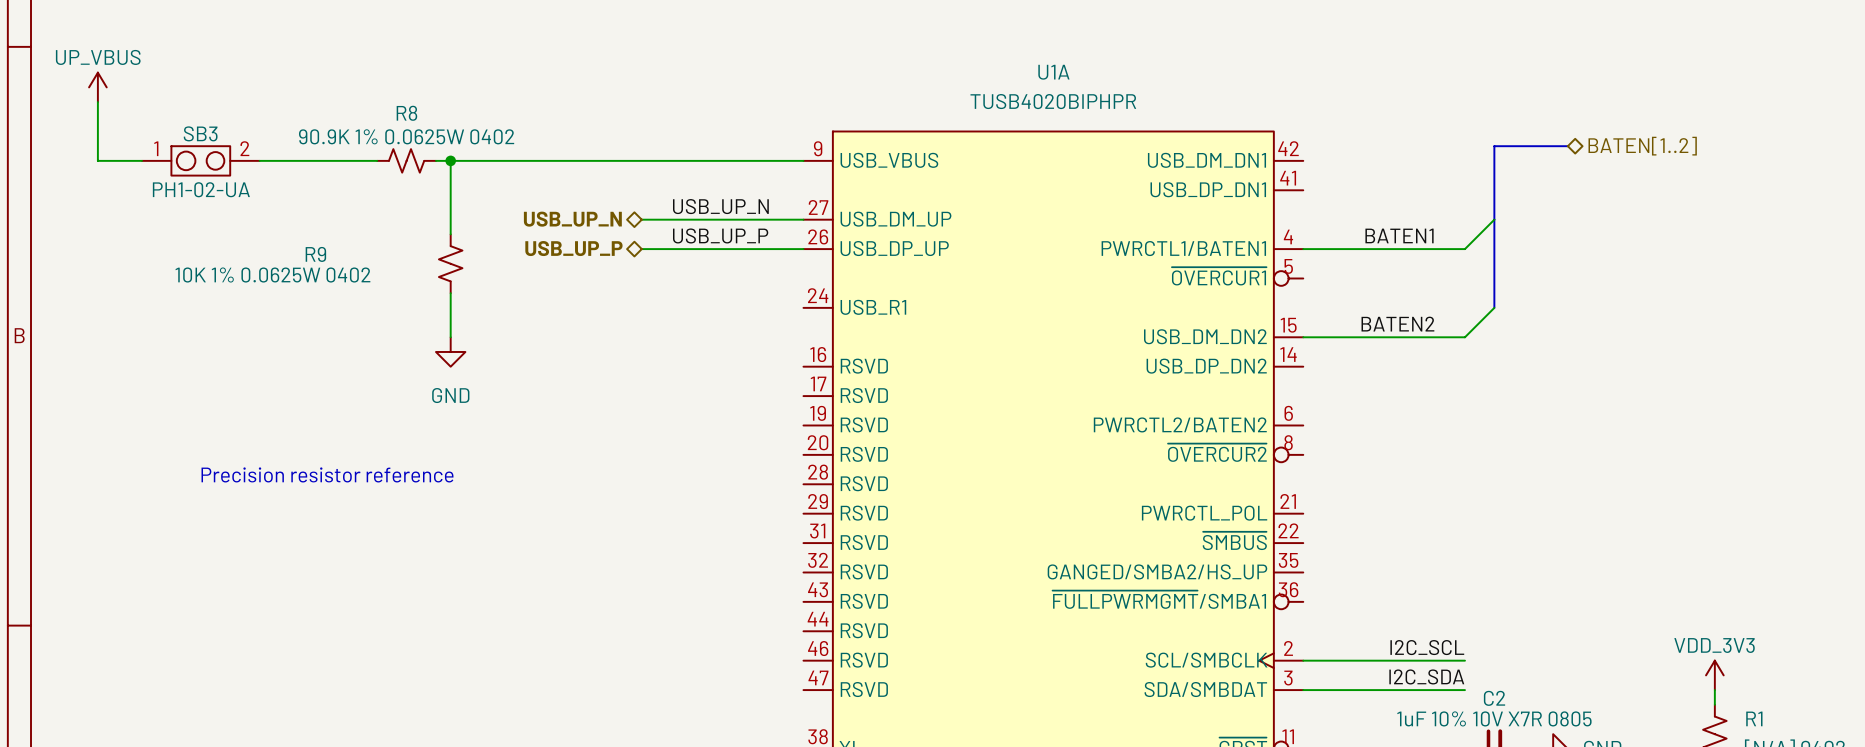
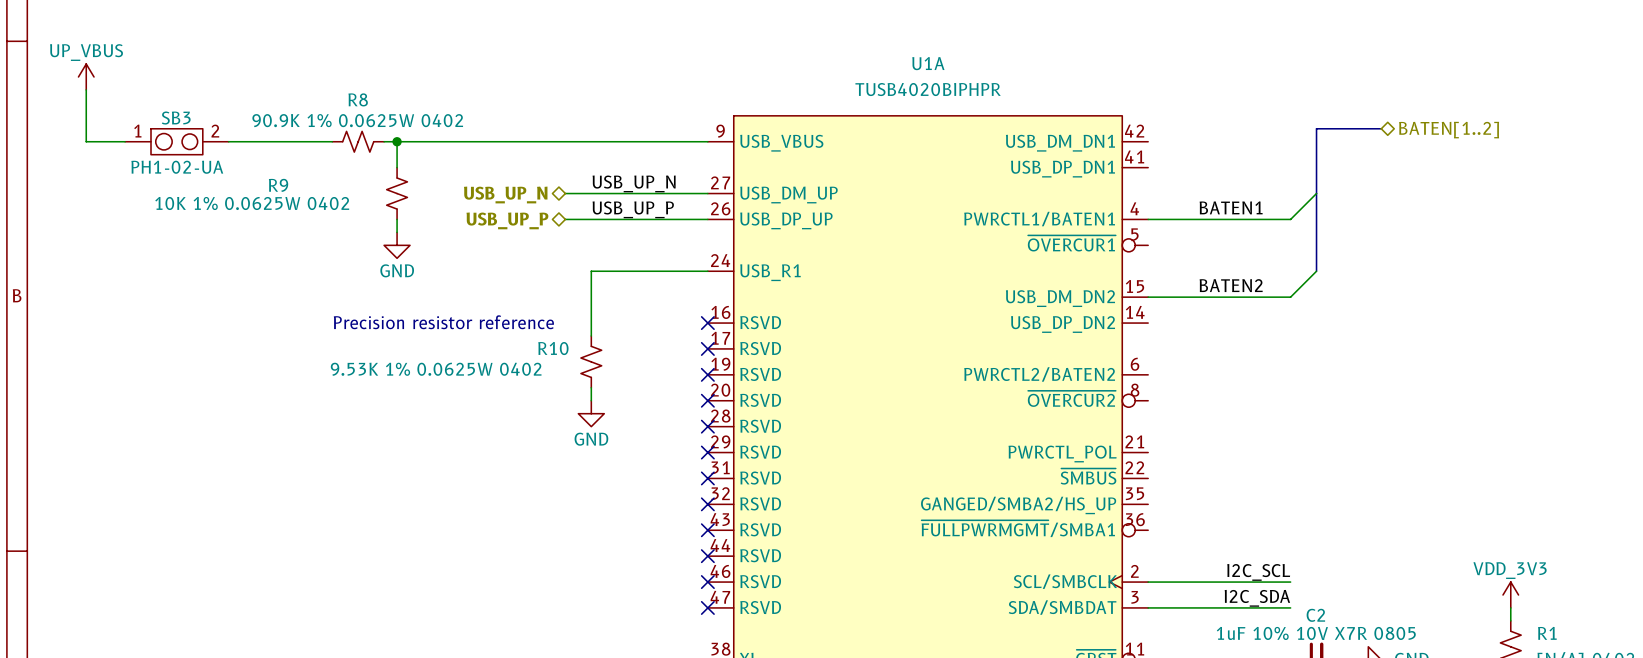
wire: (450, 190) (450, 234) -> none
wire: none -> (397, 219) (397, 232)
R9 position: (450, 263) -> (397, 193)
wire: (450, 293) (450, 337) -> none
wire: none -> (707, 271) (591, 271) (591, 335)
power symbol position: GND (450, 351) -> GND (397, 245)
no-connect mark: none -> (707, 323)
power symbol text position: GND (450, 395) -> GND (397, 270)
no-connect mark: none -> (707, 348)
R10: none -> 9.53K 1% 0.0625W 0402 (591, 361)
no-connect mark: none -> (707, 374)
wire: none -> (591, 387) (591, 400)
no-connect mark: none -> (707, 400)
power symbol: none -> GND (591, 413)
text position: Precision resistor reference (327, 474) -> Precision resistor reference (443, 322)
no-connect mark: none -> (707, 426)
no-connect mark: none -> (707, 452)
no-connect mark: none -> (707, 478)
no-connect mark: none -> (707, 504)
no-connect mark: none -> (707, 530)
no-connect mark: none -> (707, 556)
no-connect mark: none -> (707, 582)
no-connect mark: none -> (707, 607)

